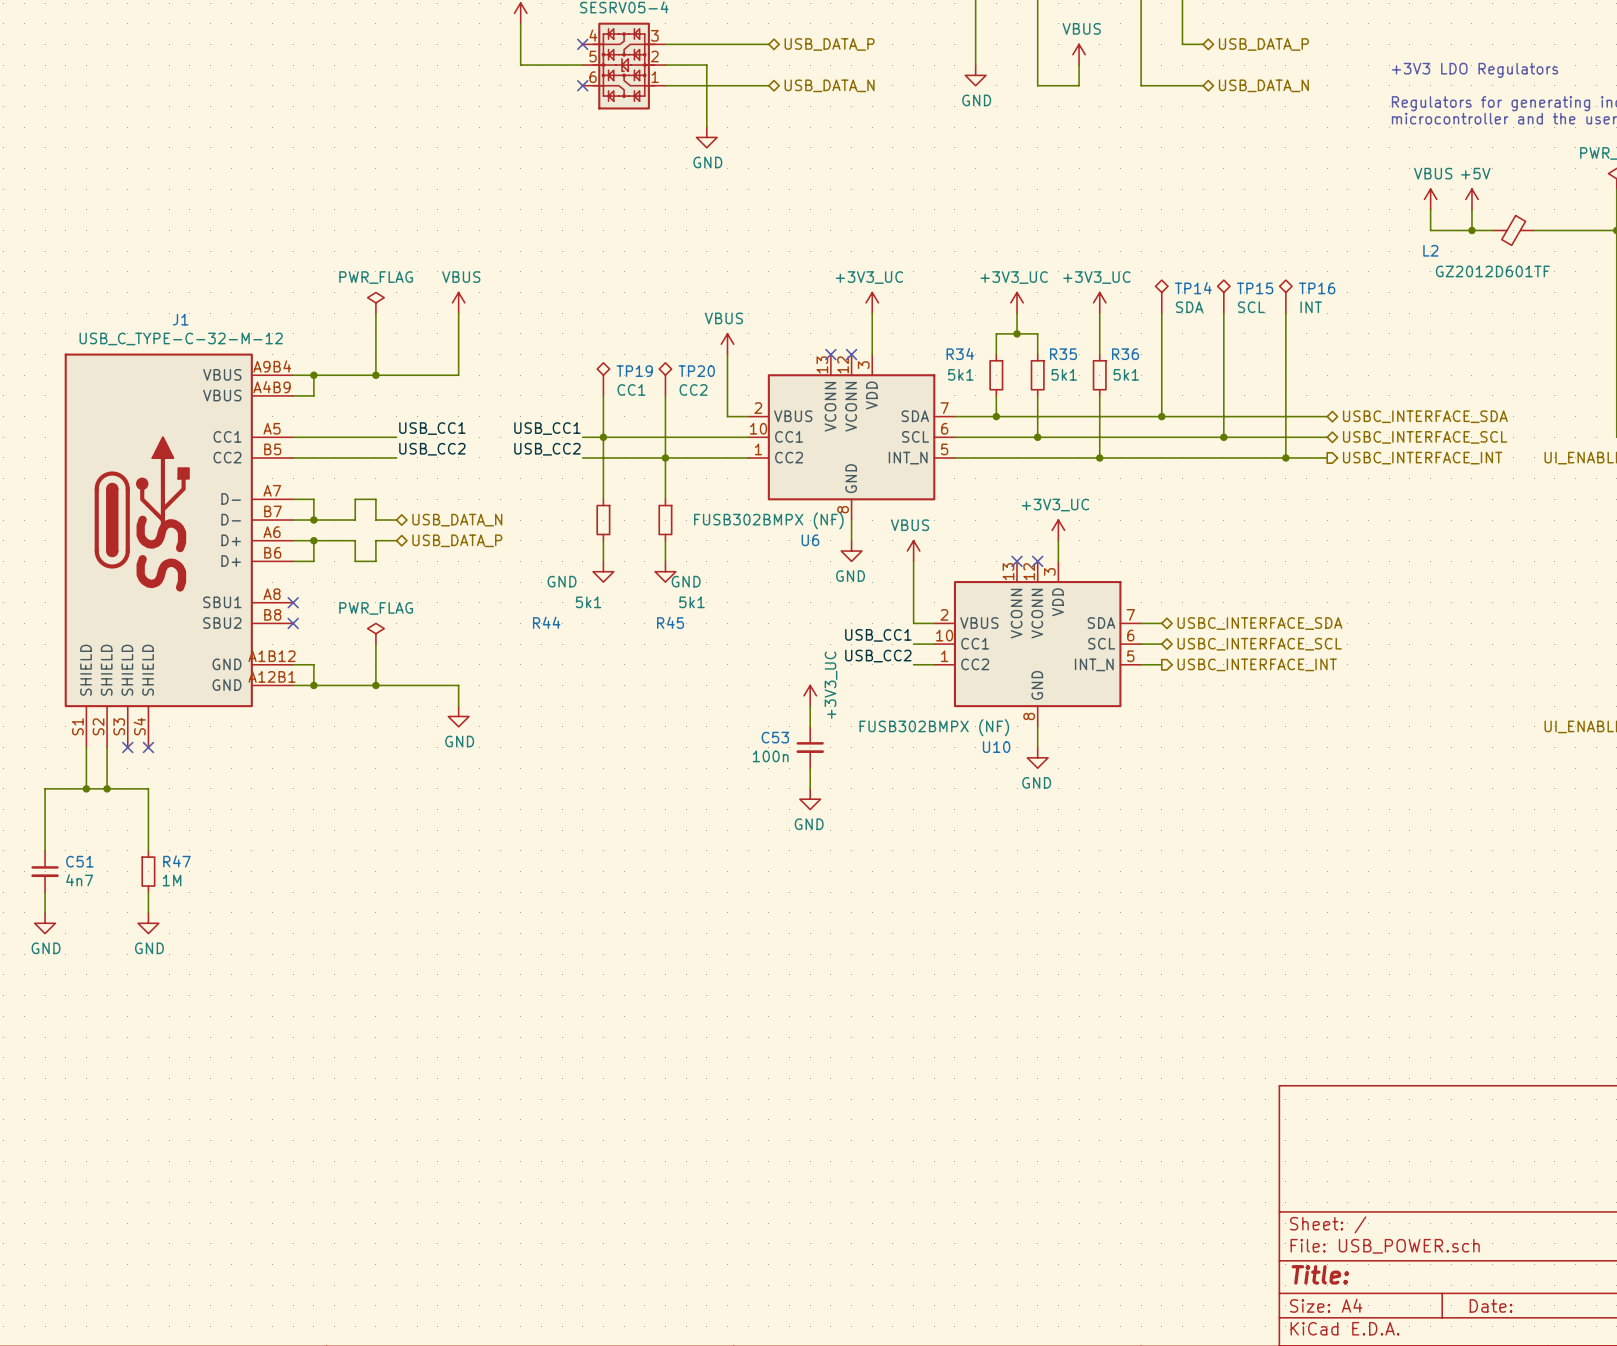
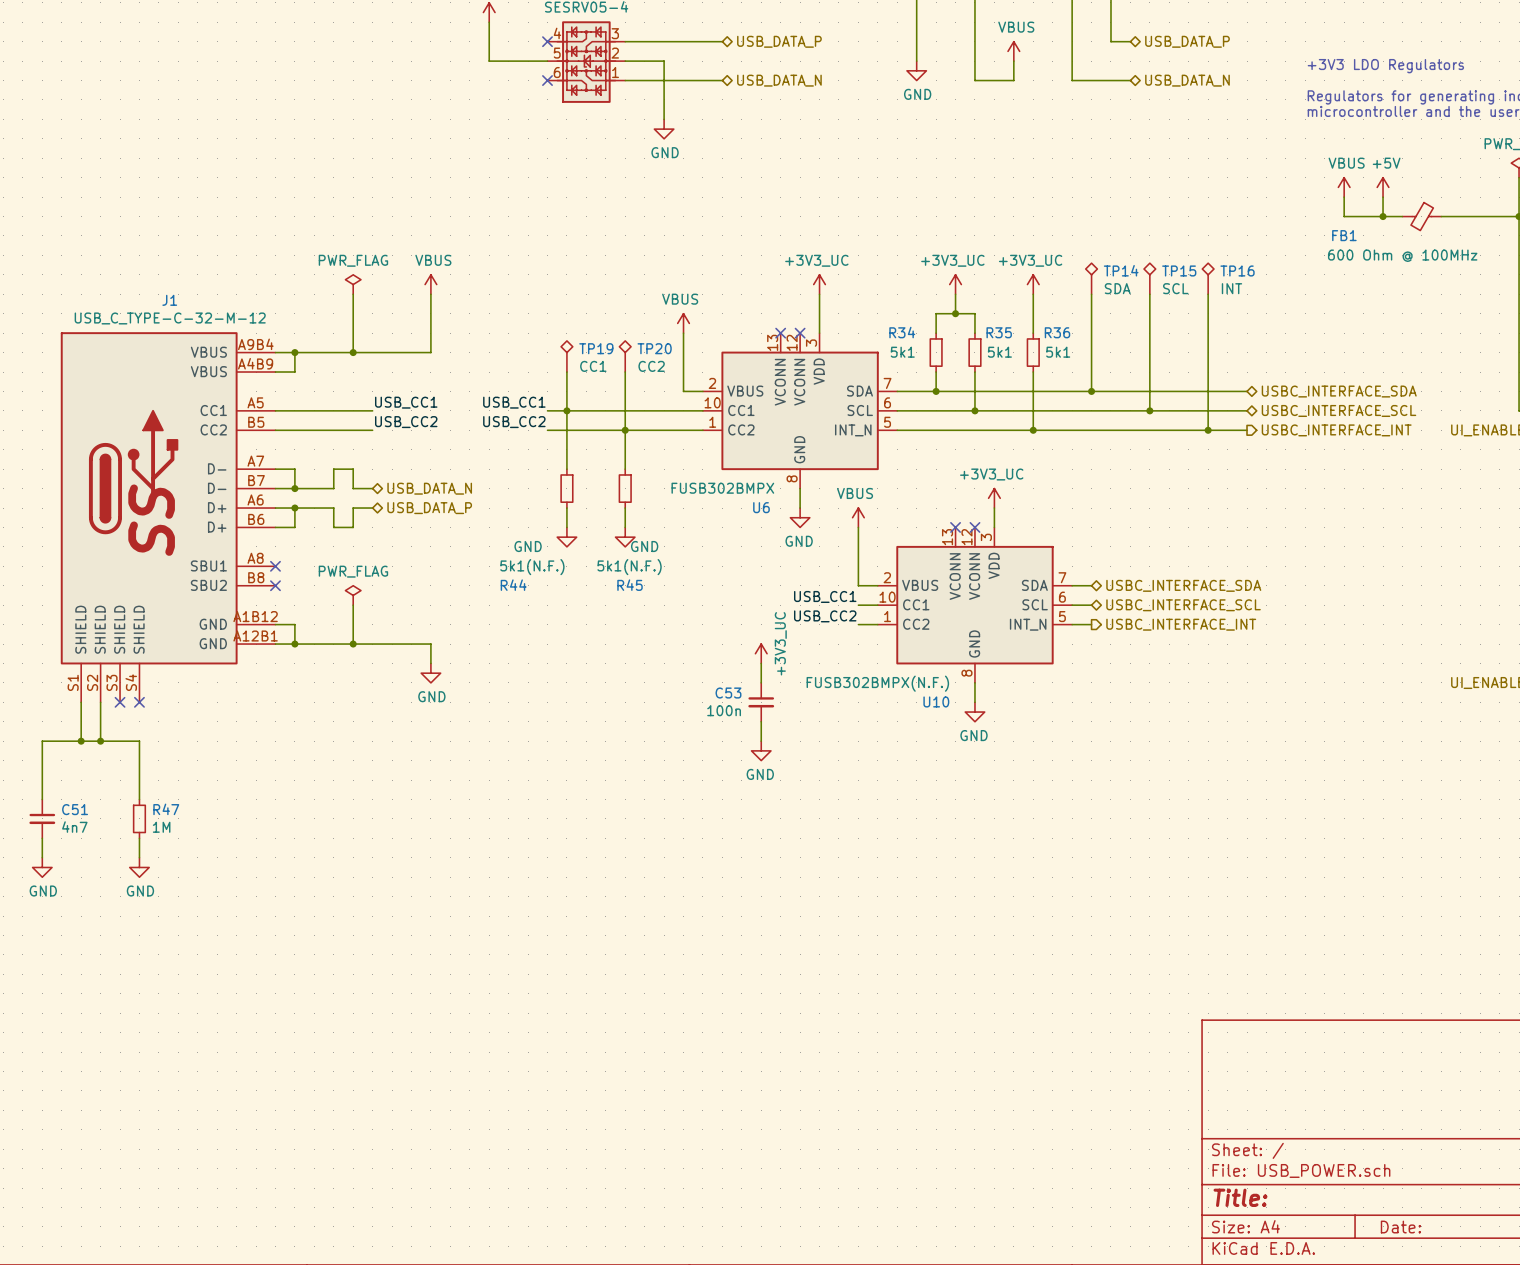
L2 name: L2 (1430, 250) -> FB1 (1344, 235)
L2 value: GZ2012D601TF (1492, 271) -> 600 Ohm @ 100MHz (1402, 255)
U6 value: FUSB302BMPX (NF) (768, 520) -> FUSB302BMPX (722, 488)
R44 value: 5k1 (588, 602) -> 5k1(N.F.) (532, 567)
R45 value: 5k1 (691, 602) -> 5k1(N.F.) (629, 567)
U10 value: FUSB302BMPX (NF) (934, 727) -> FUSB302BMPX(N.F.) (877, 683)

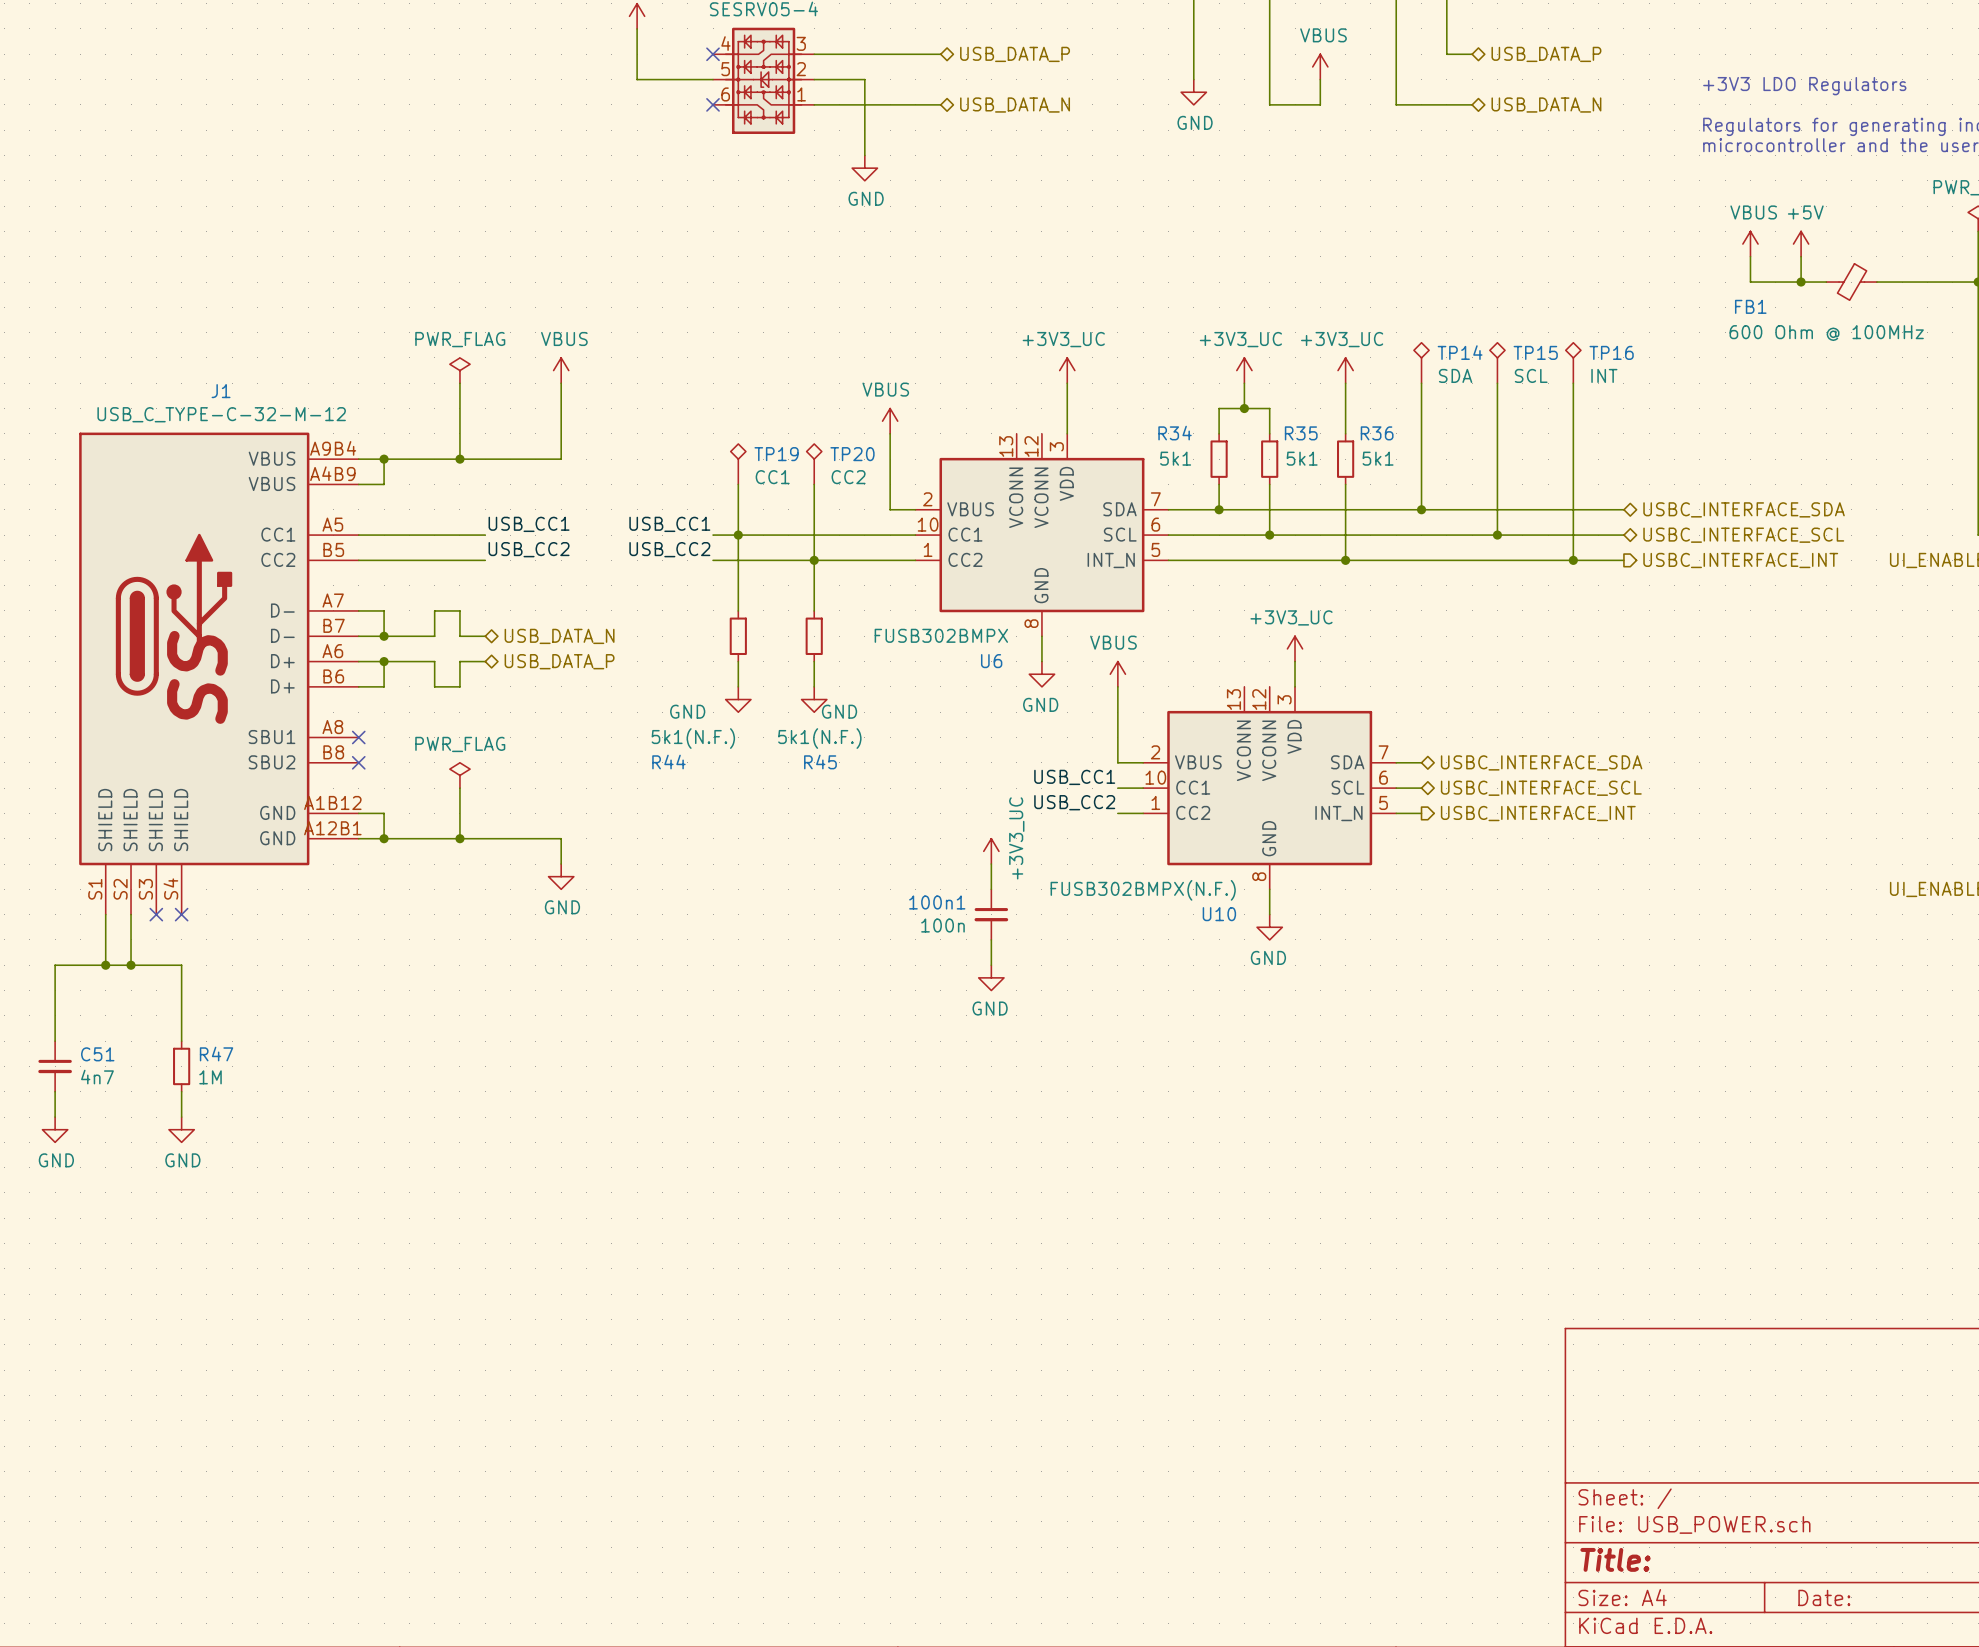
no-connect mark: (780, 333) -> none
no-connect mark: (800, 333) -> none
no-connect mark: (955, 527) -> none
no-connect mark: (974, 527) -> none
C53 name: C53 (728, 693) -> 100n1 (937, 902)

